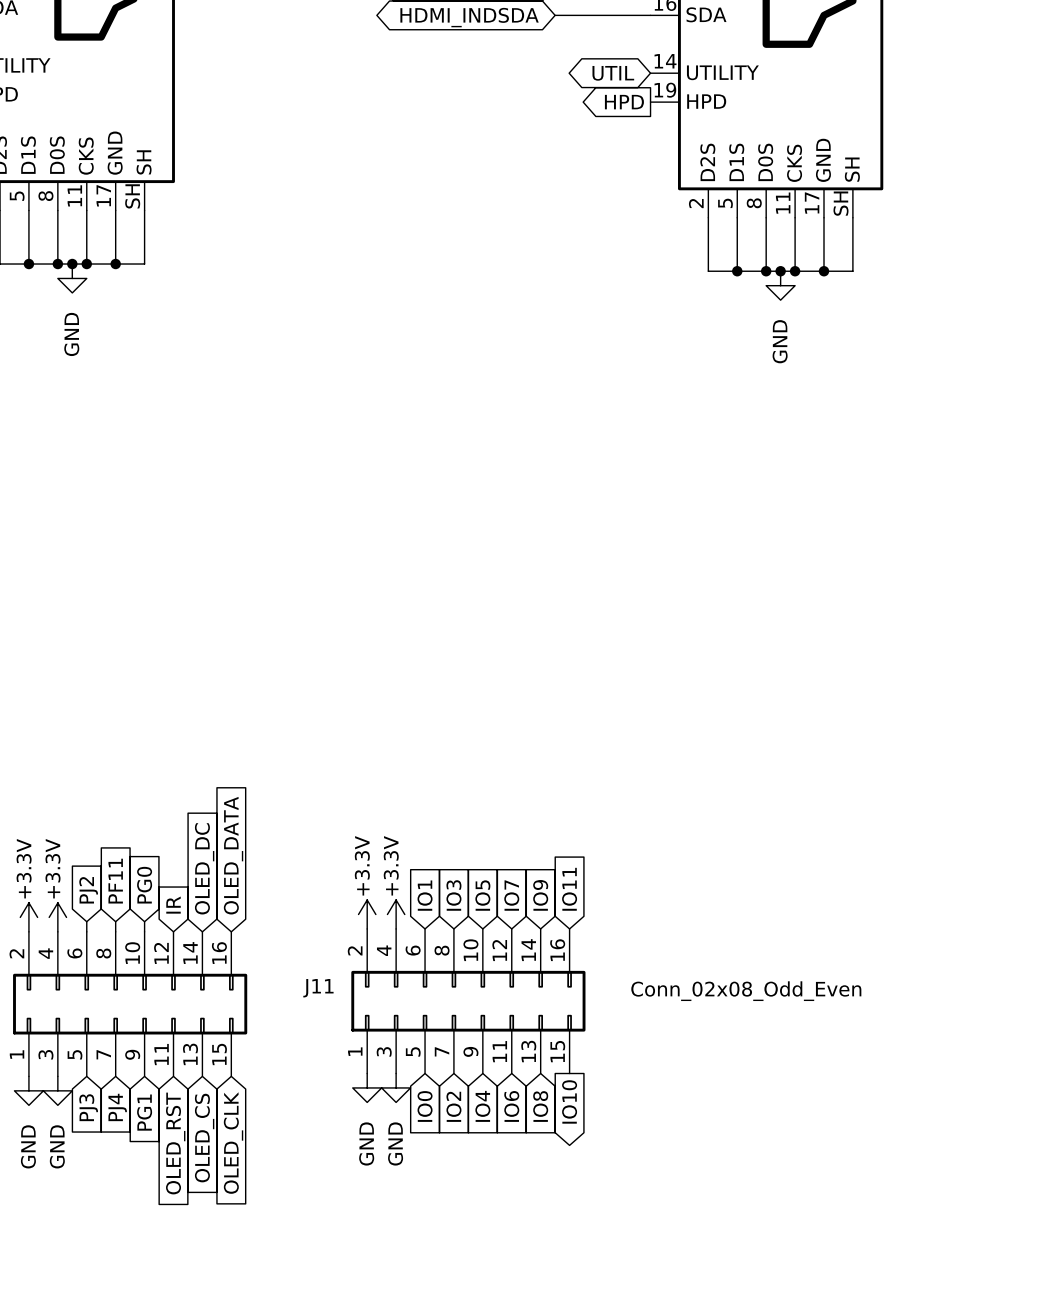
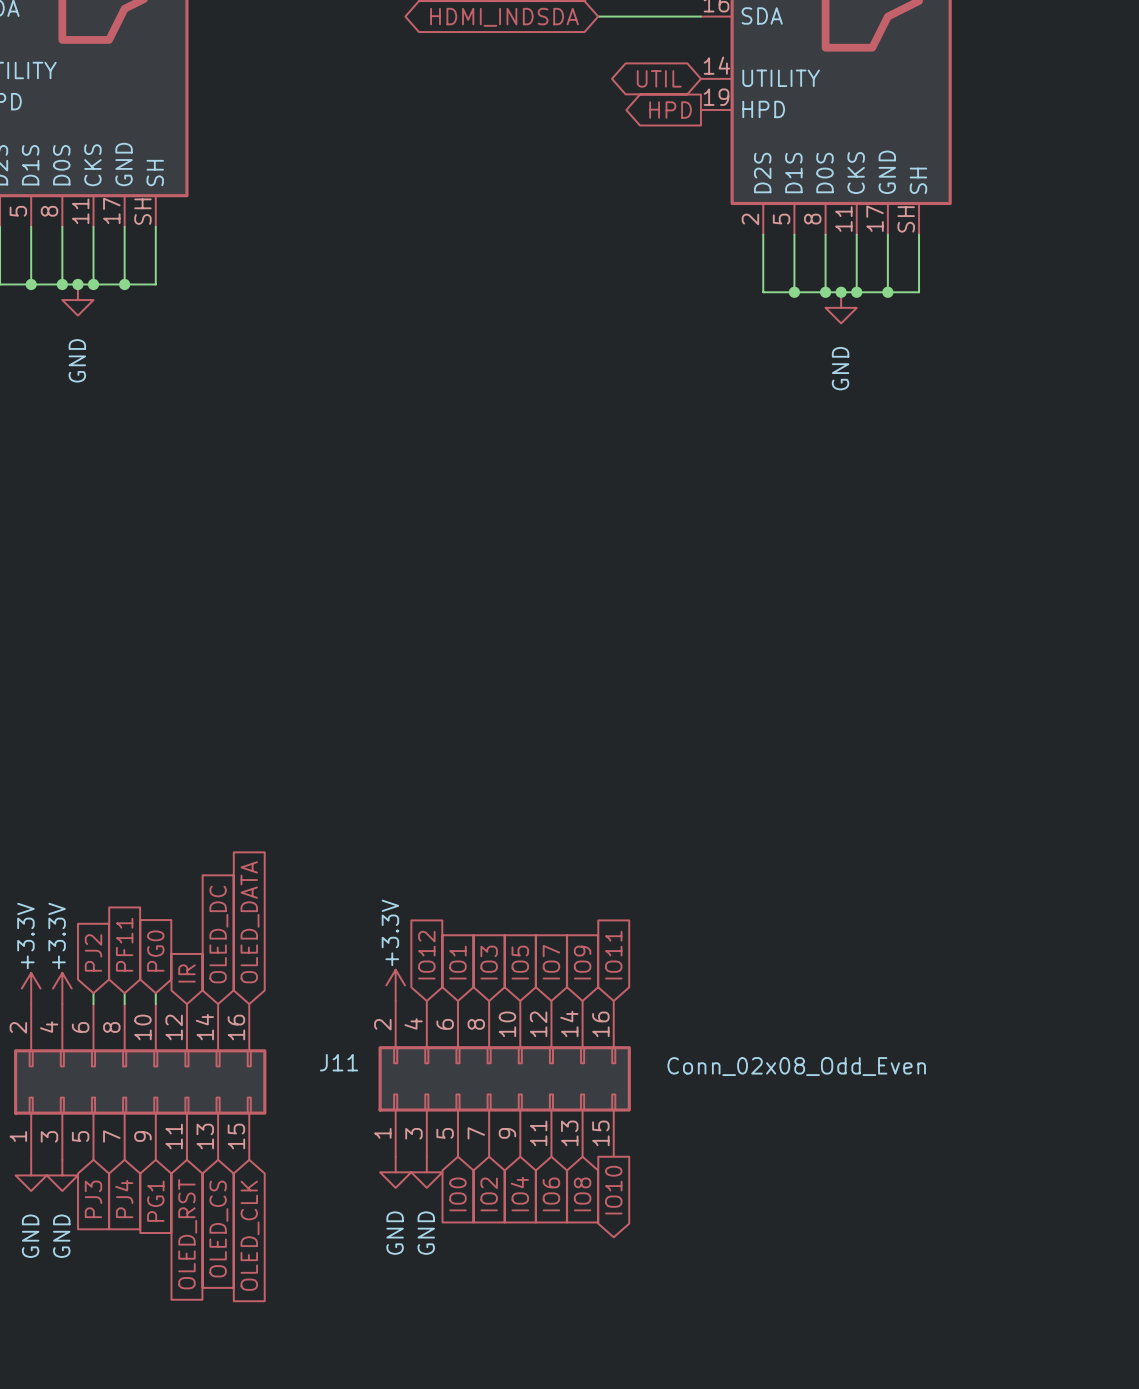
global label: none -> IO12 (426, 955)
power symbol: +3.3V (396, 914) -> none

